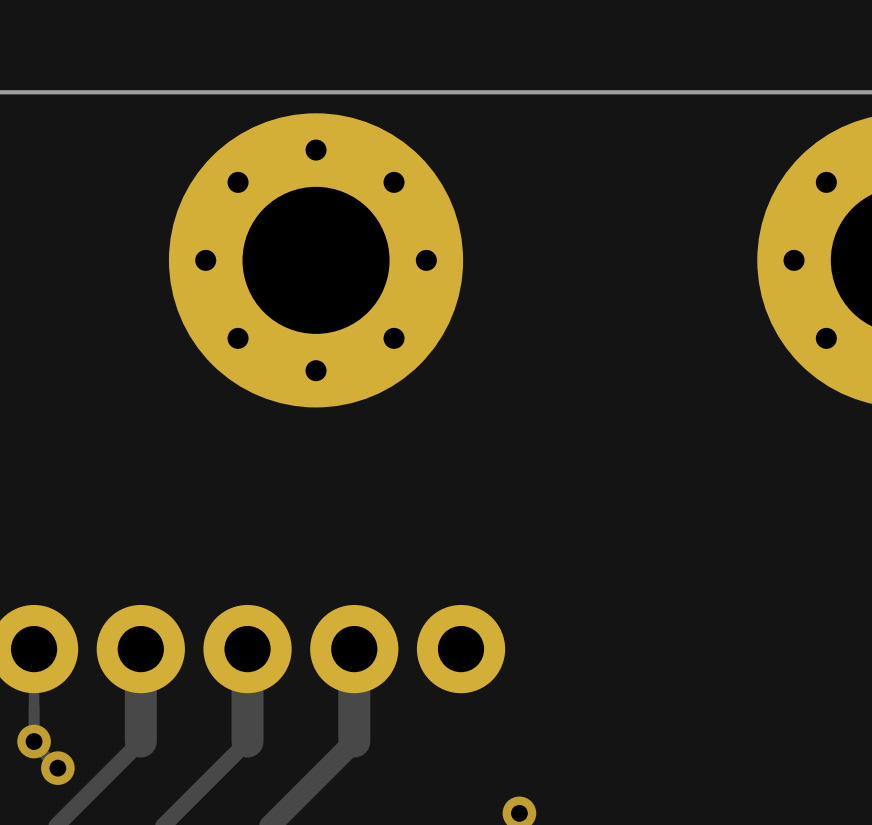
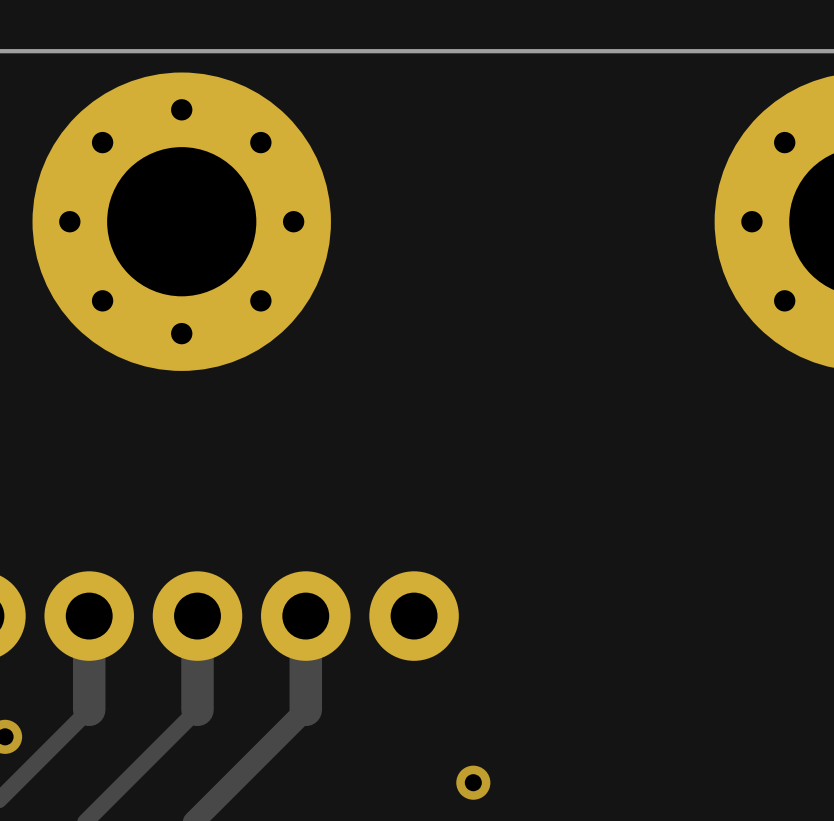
part position: (316, 260) -> (181, 221)

